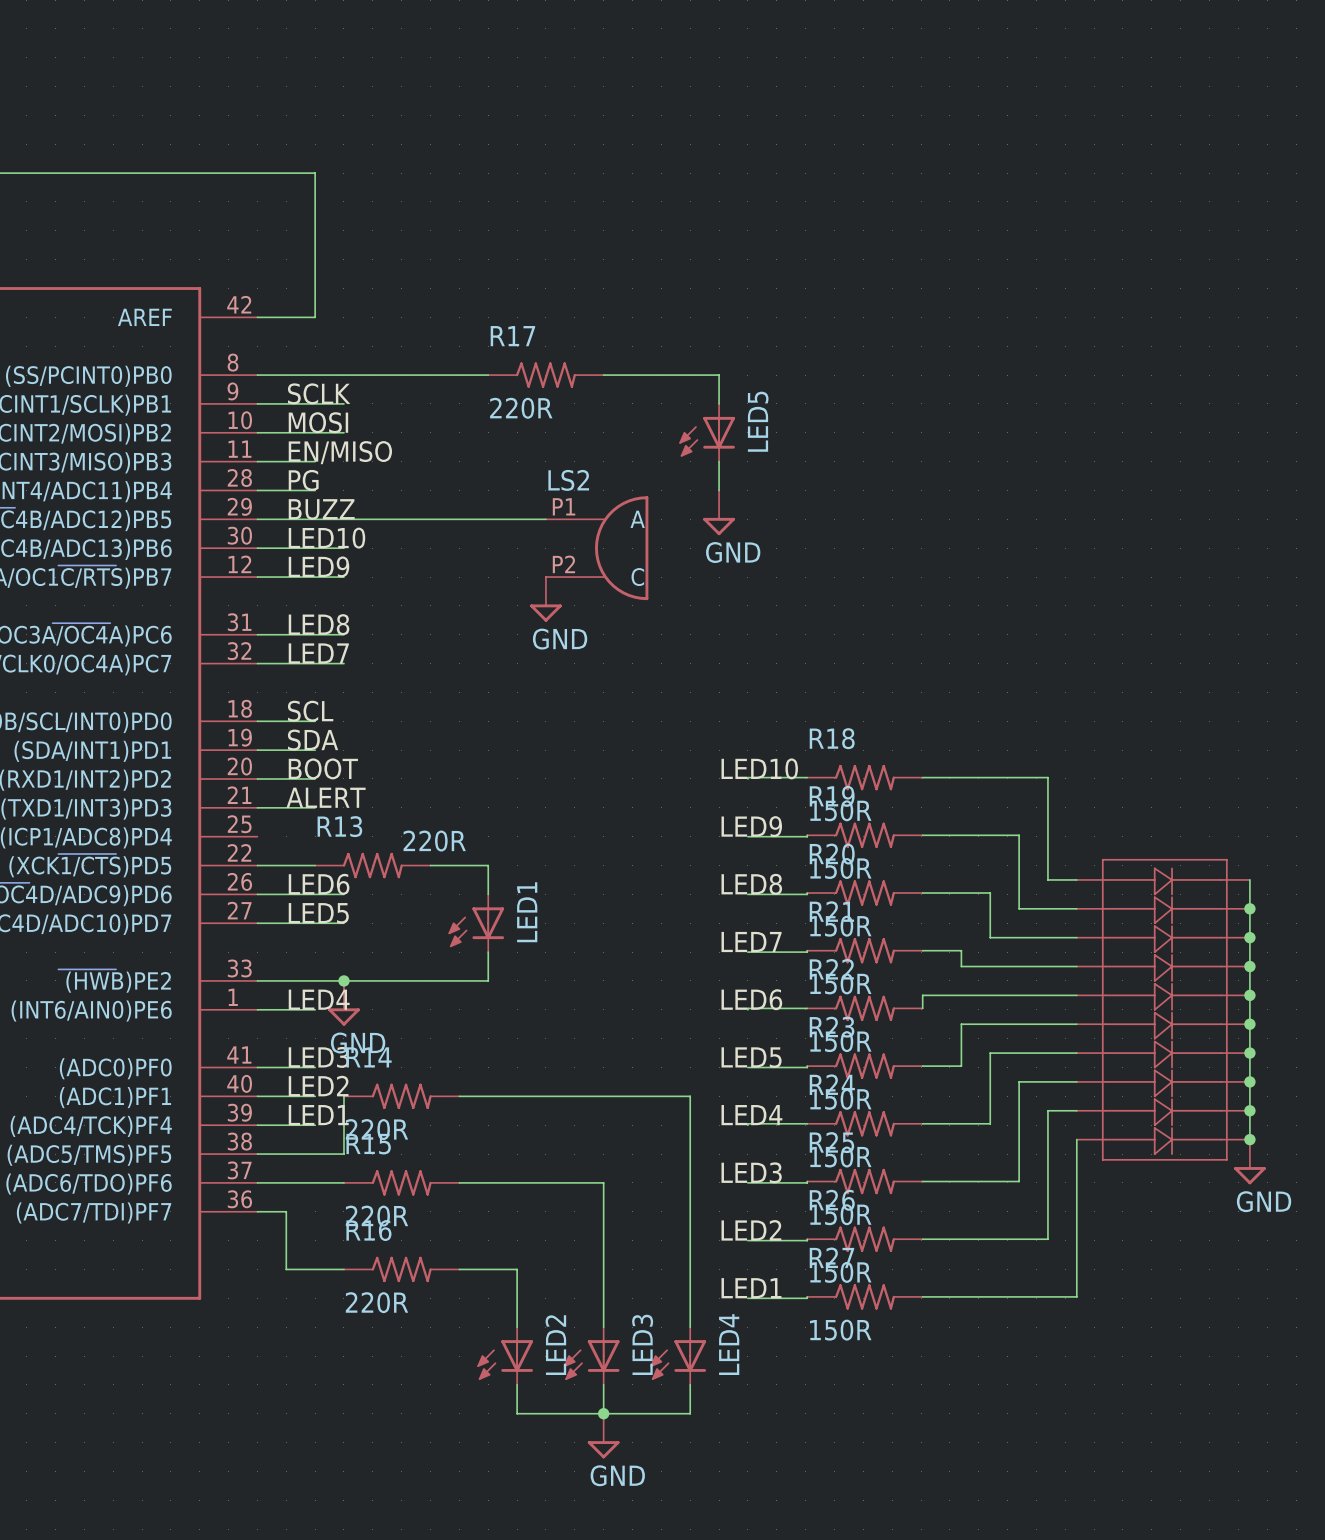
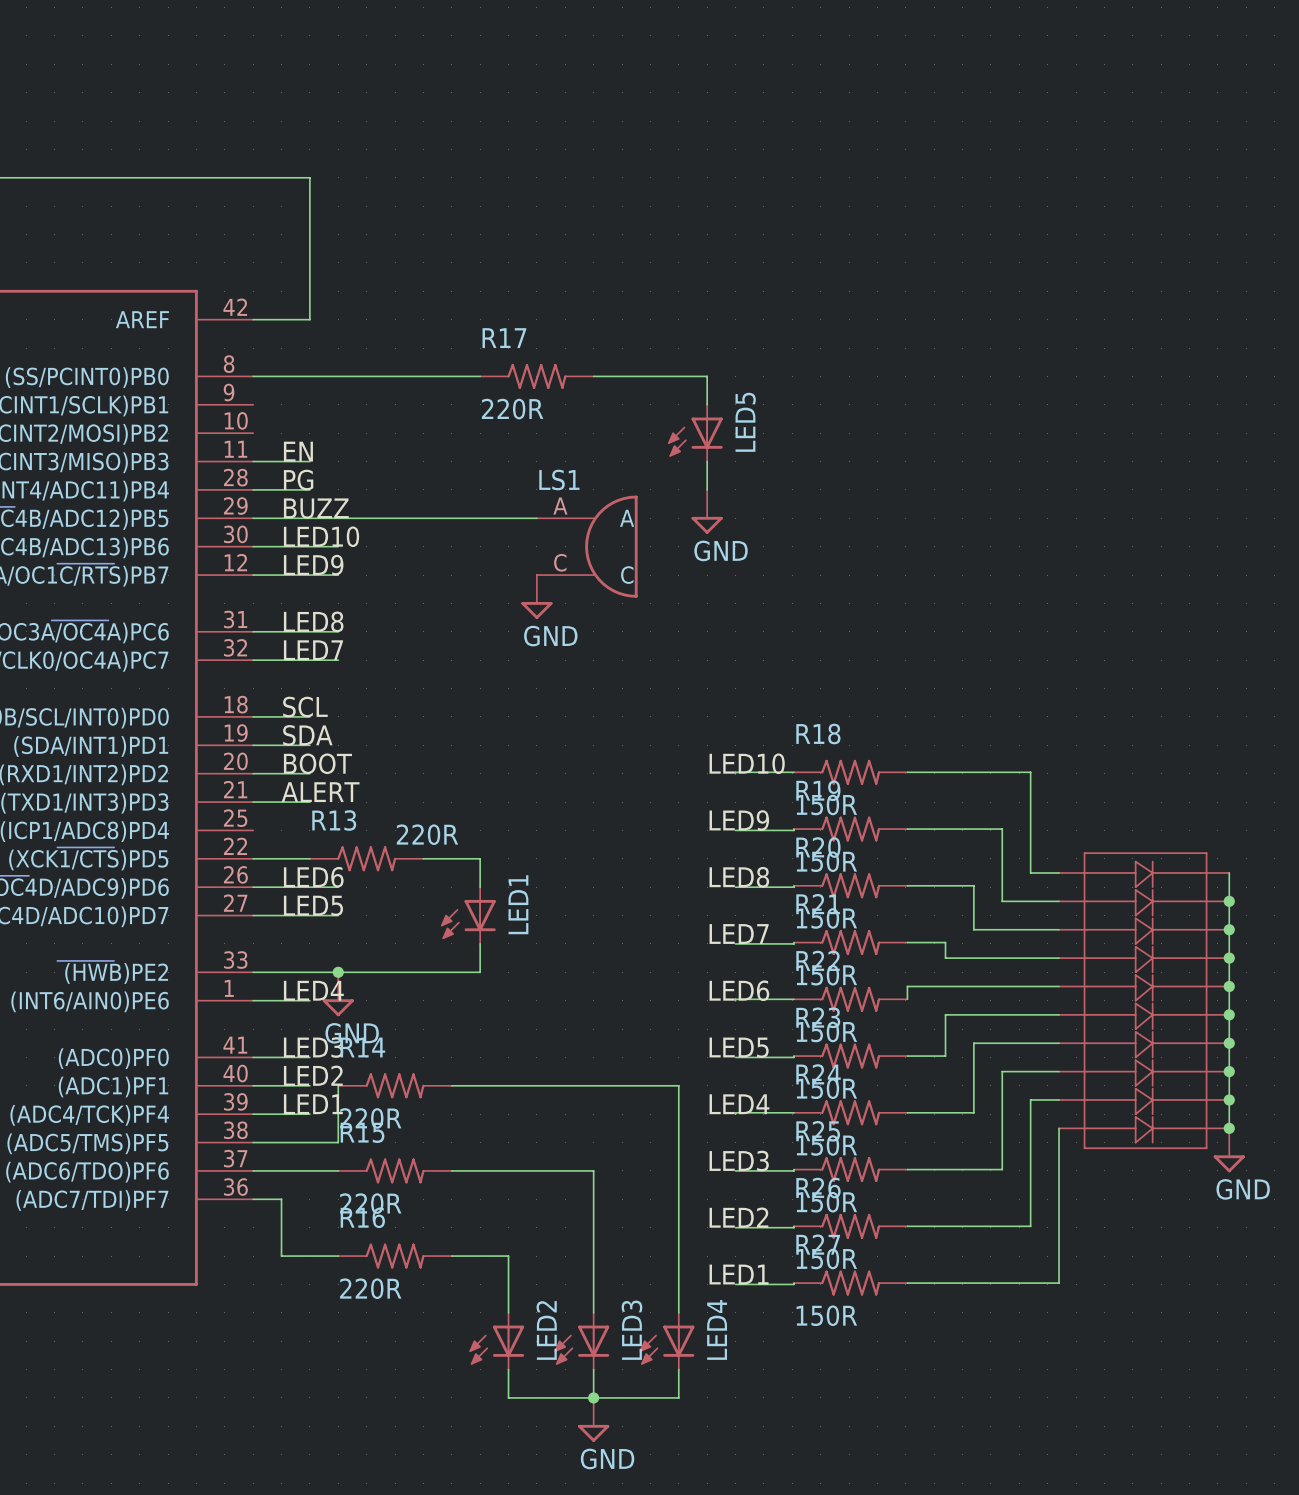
label: SCLK (319, 393) -> none
wire: (257, 403) (343, 403) -> none
label: MOSI (318, 422) -> none
wire: (257, 432) (343, 432) -> none
label: EN/MISO (340, 452) -> EN (298, 451)
LS2 name: LS2 (568, 480) -> LS1 (559, 480)
LS2 pin number: P1 (564, 506) -> A (560, 506)
LS2 pin number: P2 (563, 564) -> C (560, 562)

